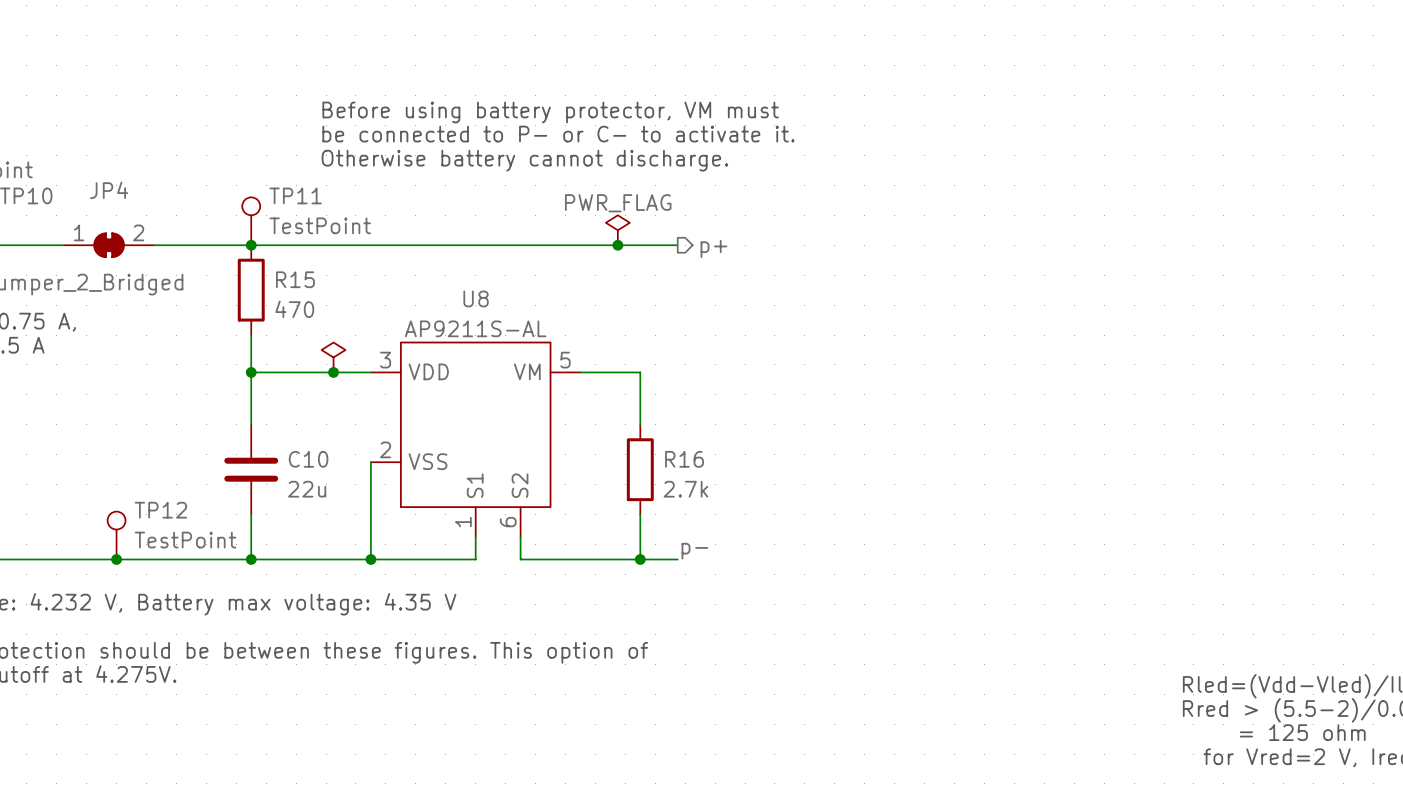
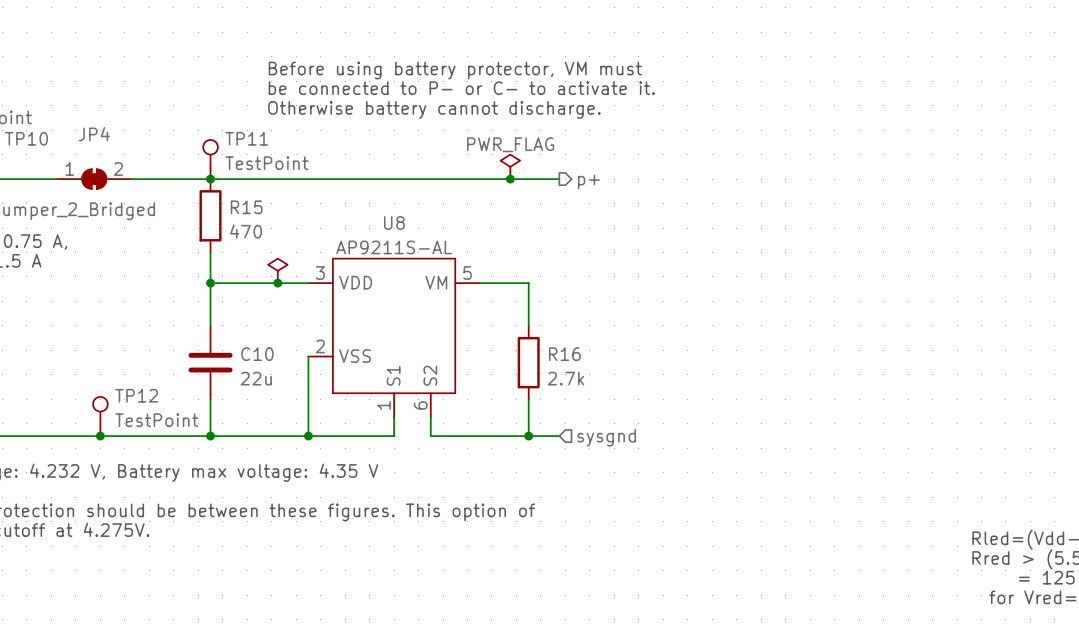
label: p- (694, 551) -> none
hierarchical label: none -> sysgnd (606, 437)

